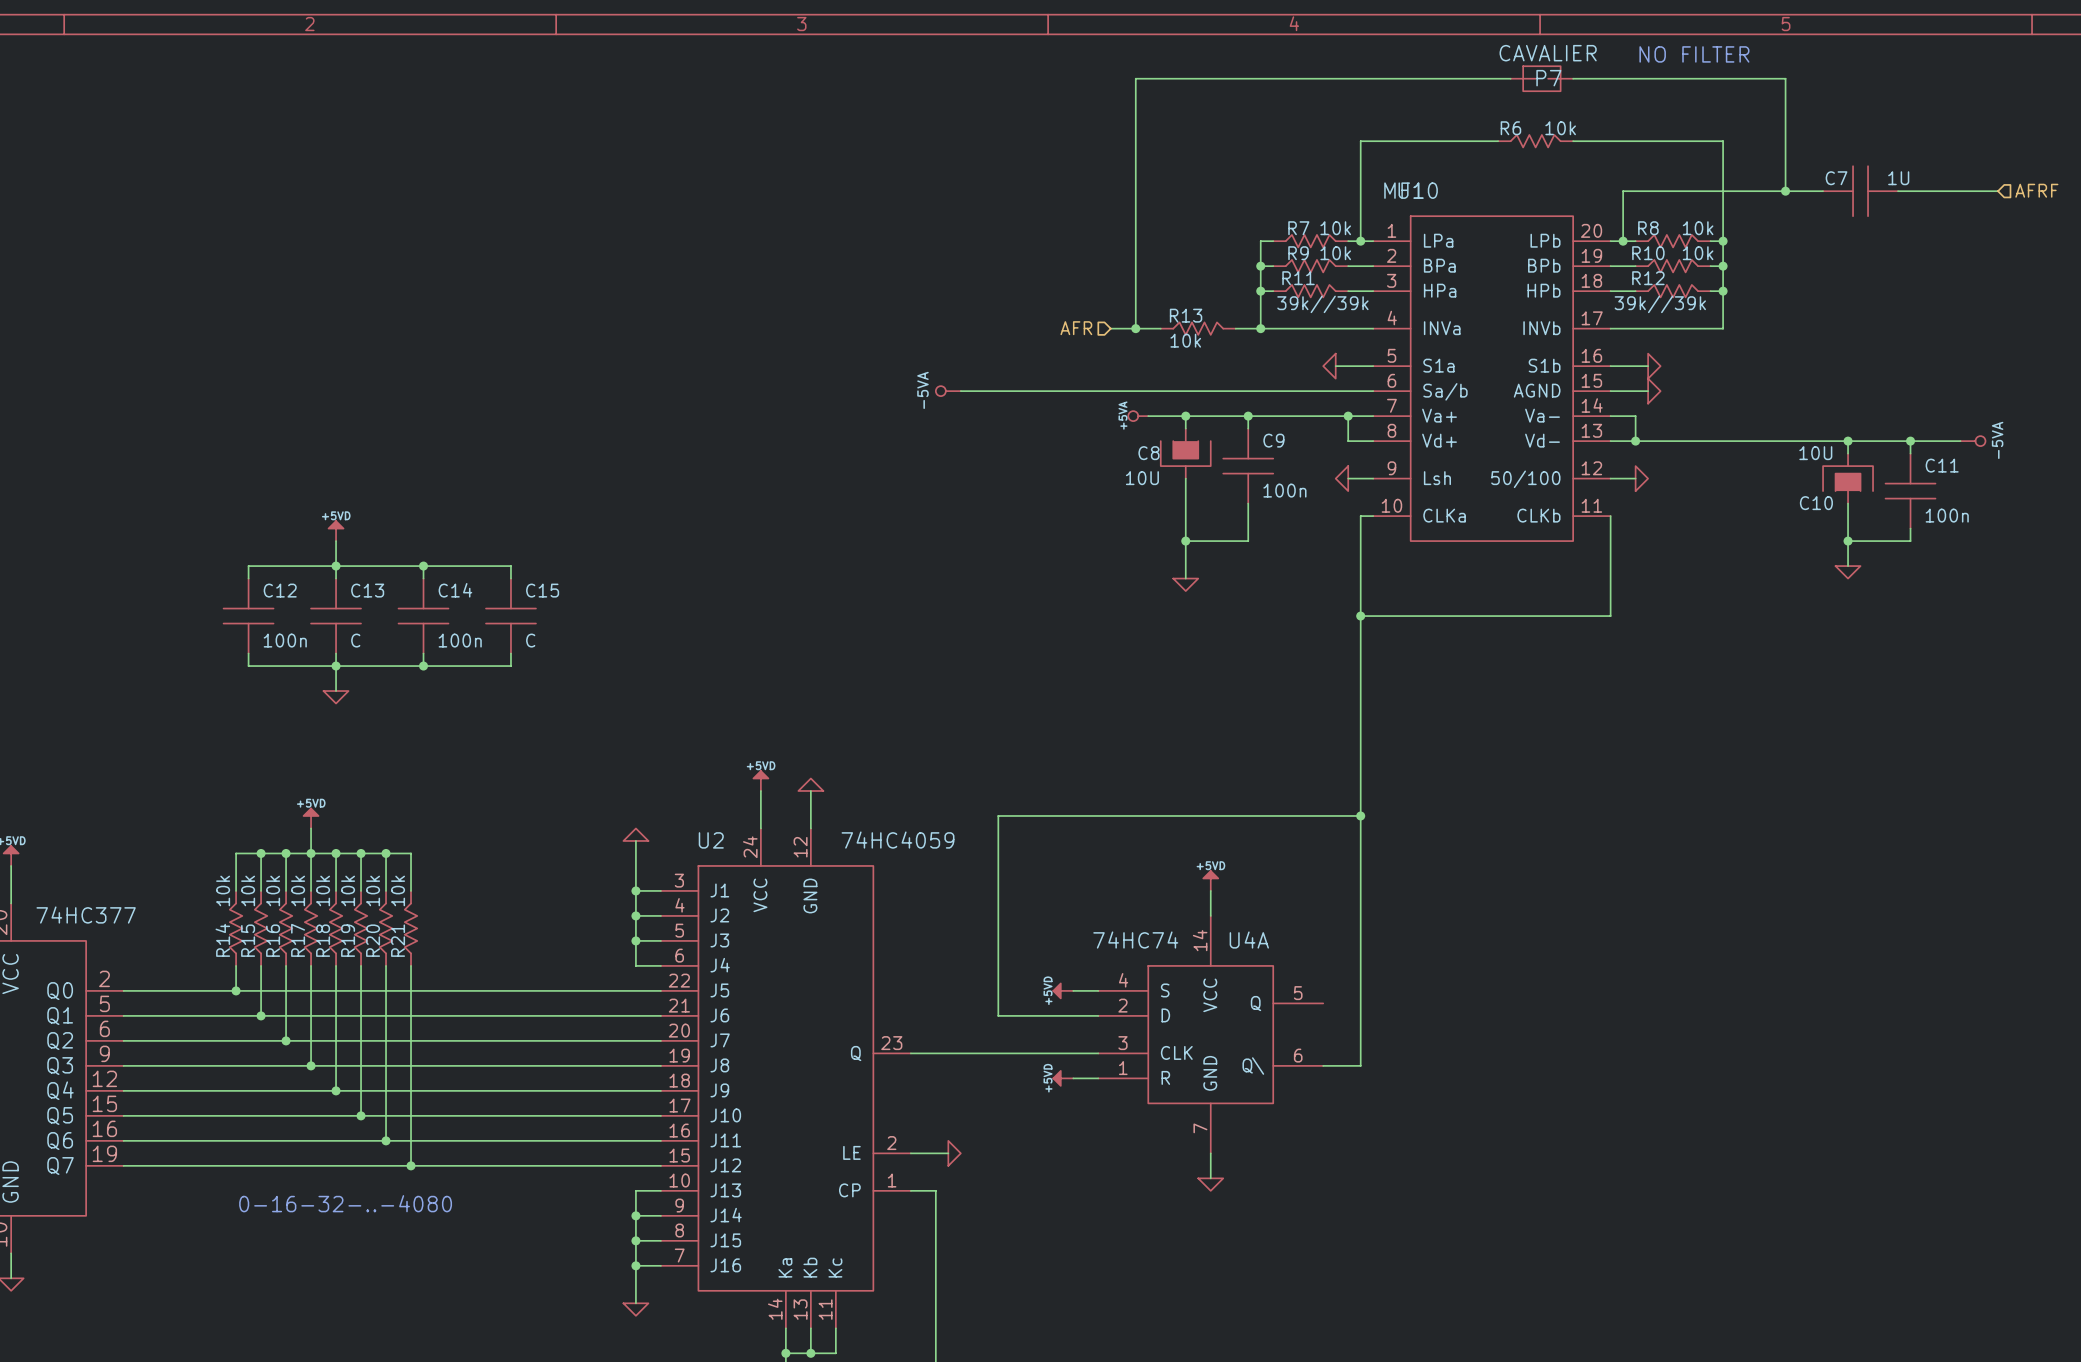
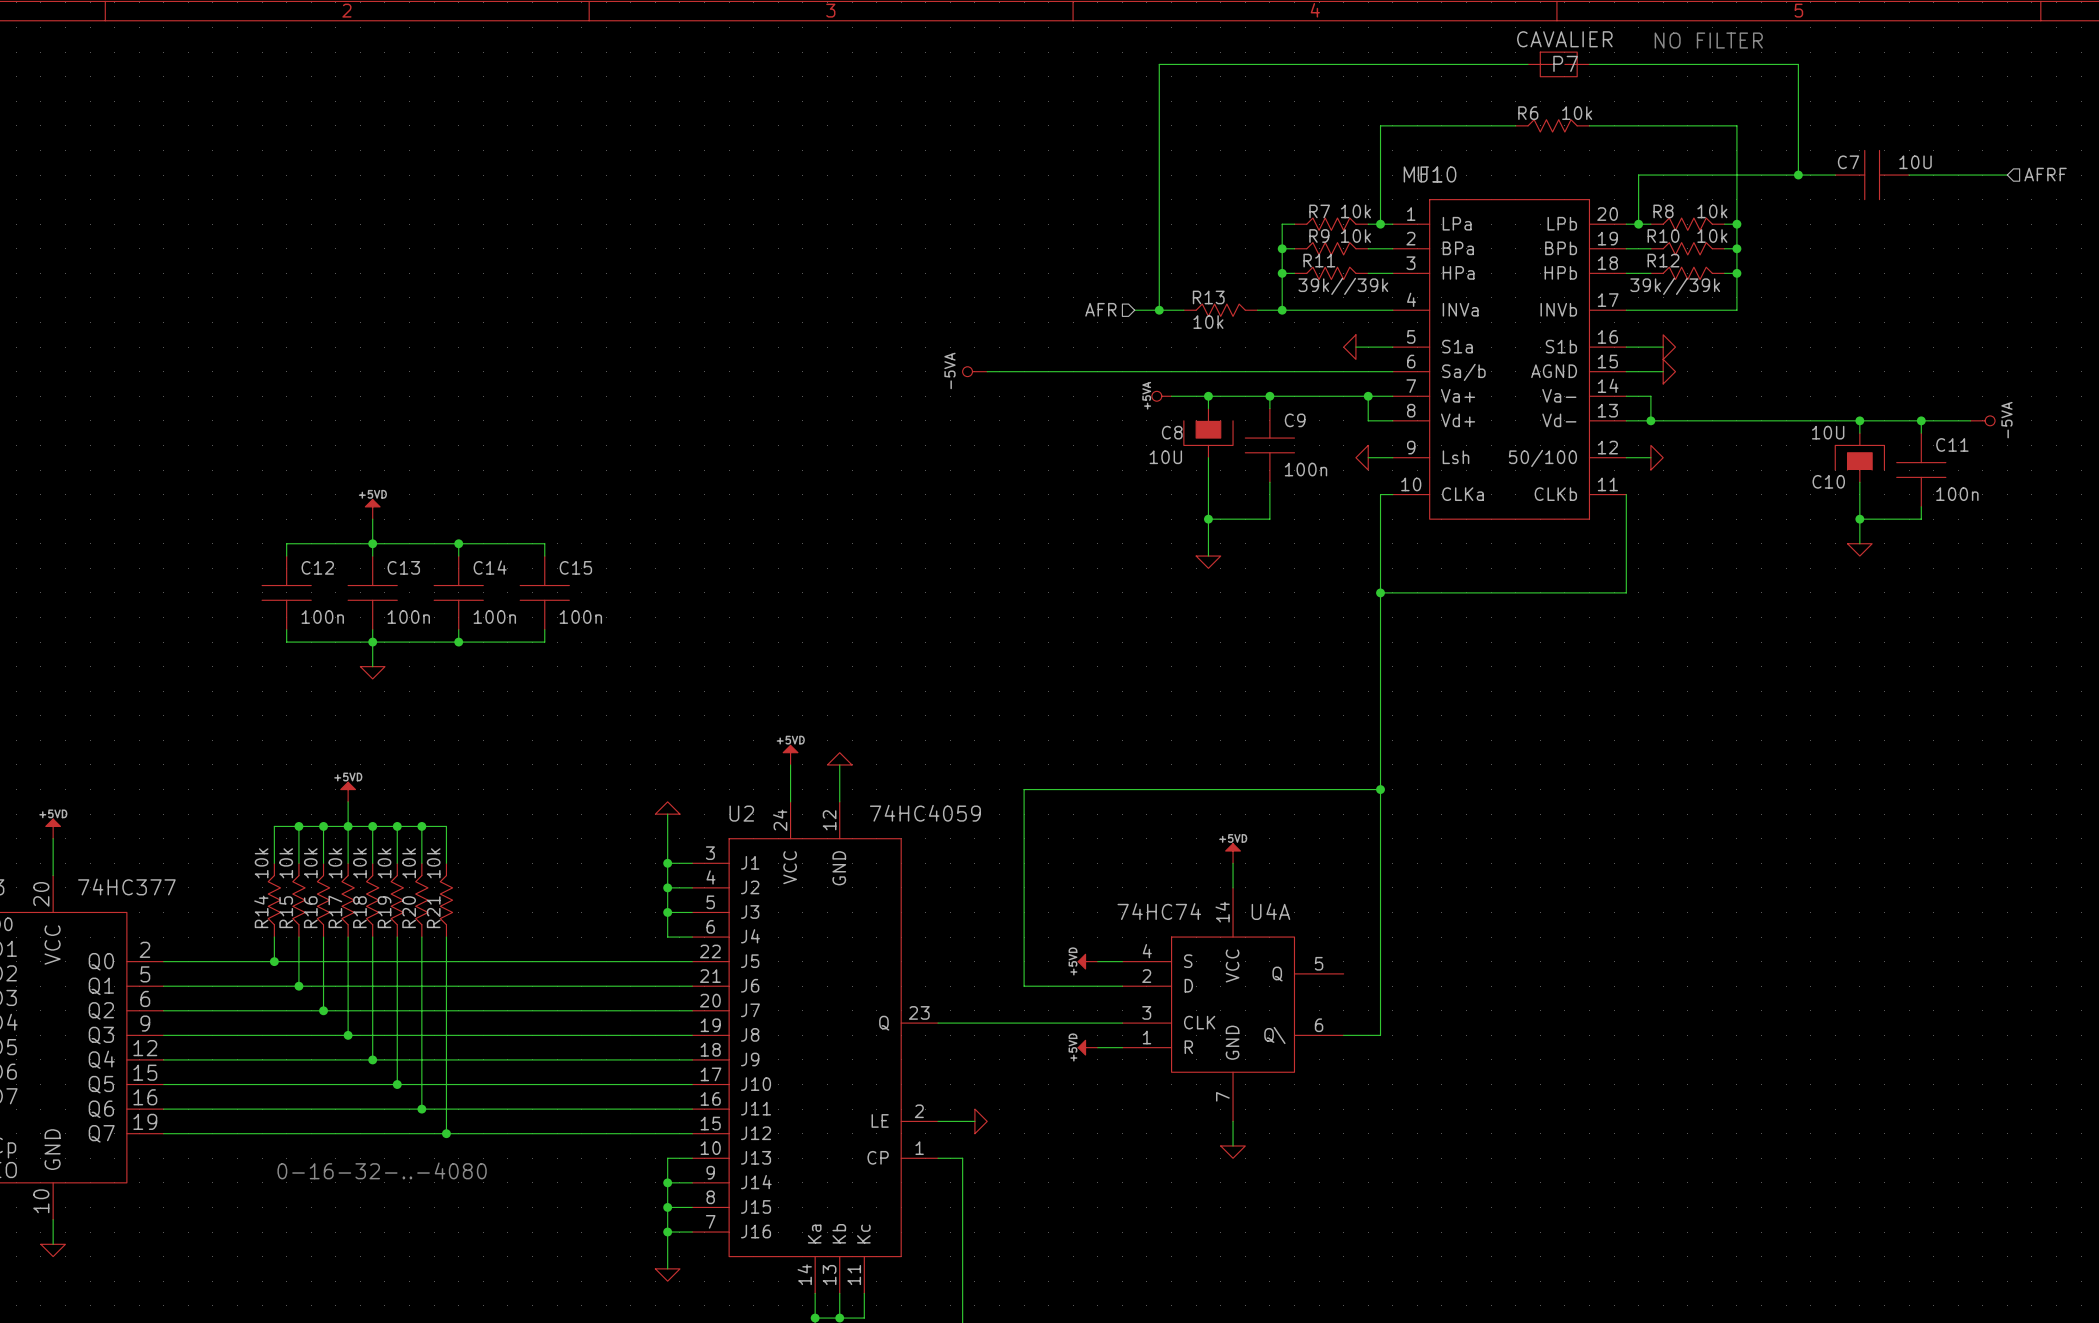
C7 value: 1U (1898, 178) -> 10U (1915, 162)
C13 value: C (355, 640) -> 100n (408, 617)
C15 value: C (530, 640) -> 100n (580, 617)

